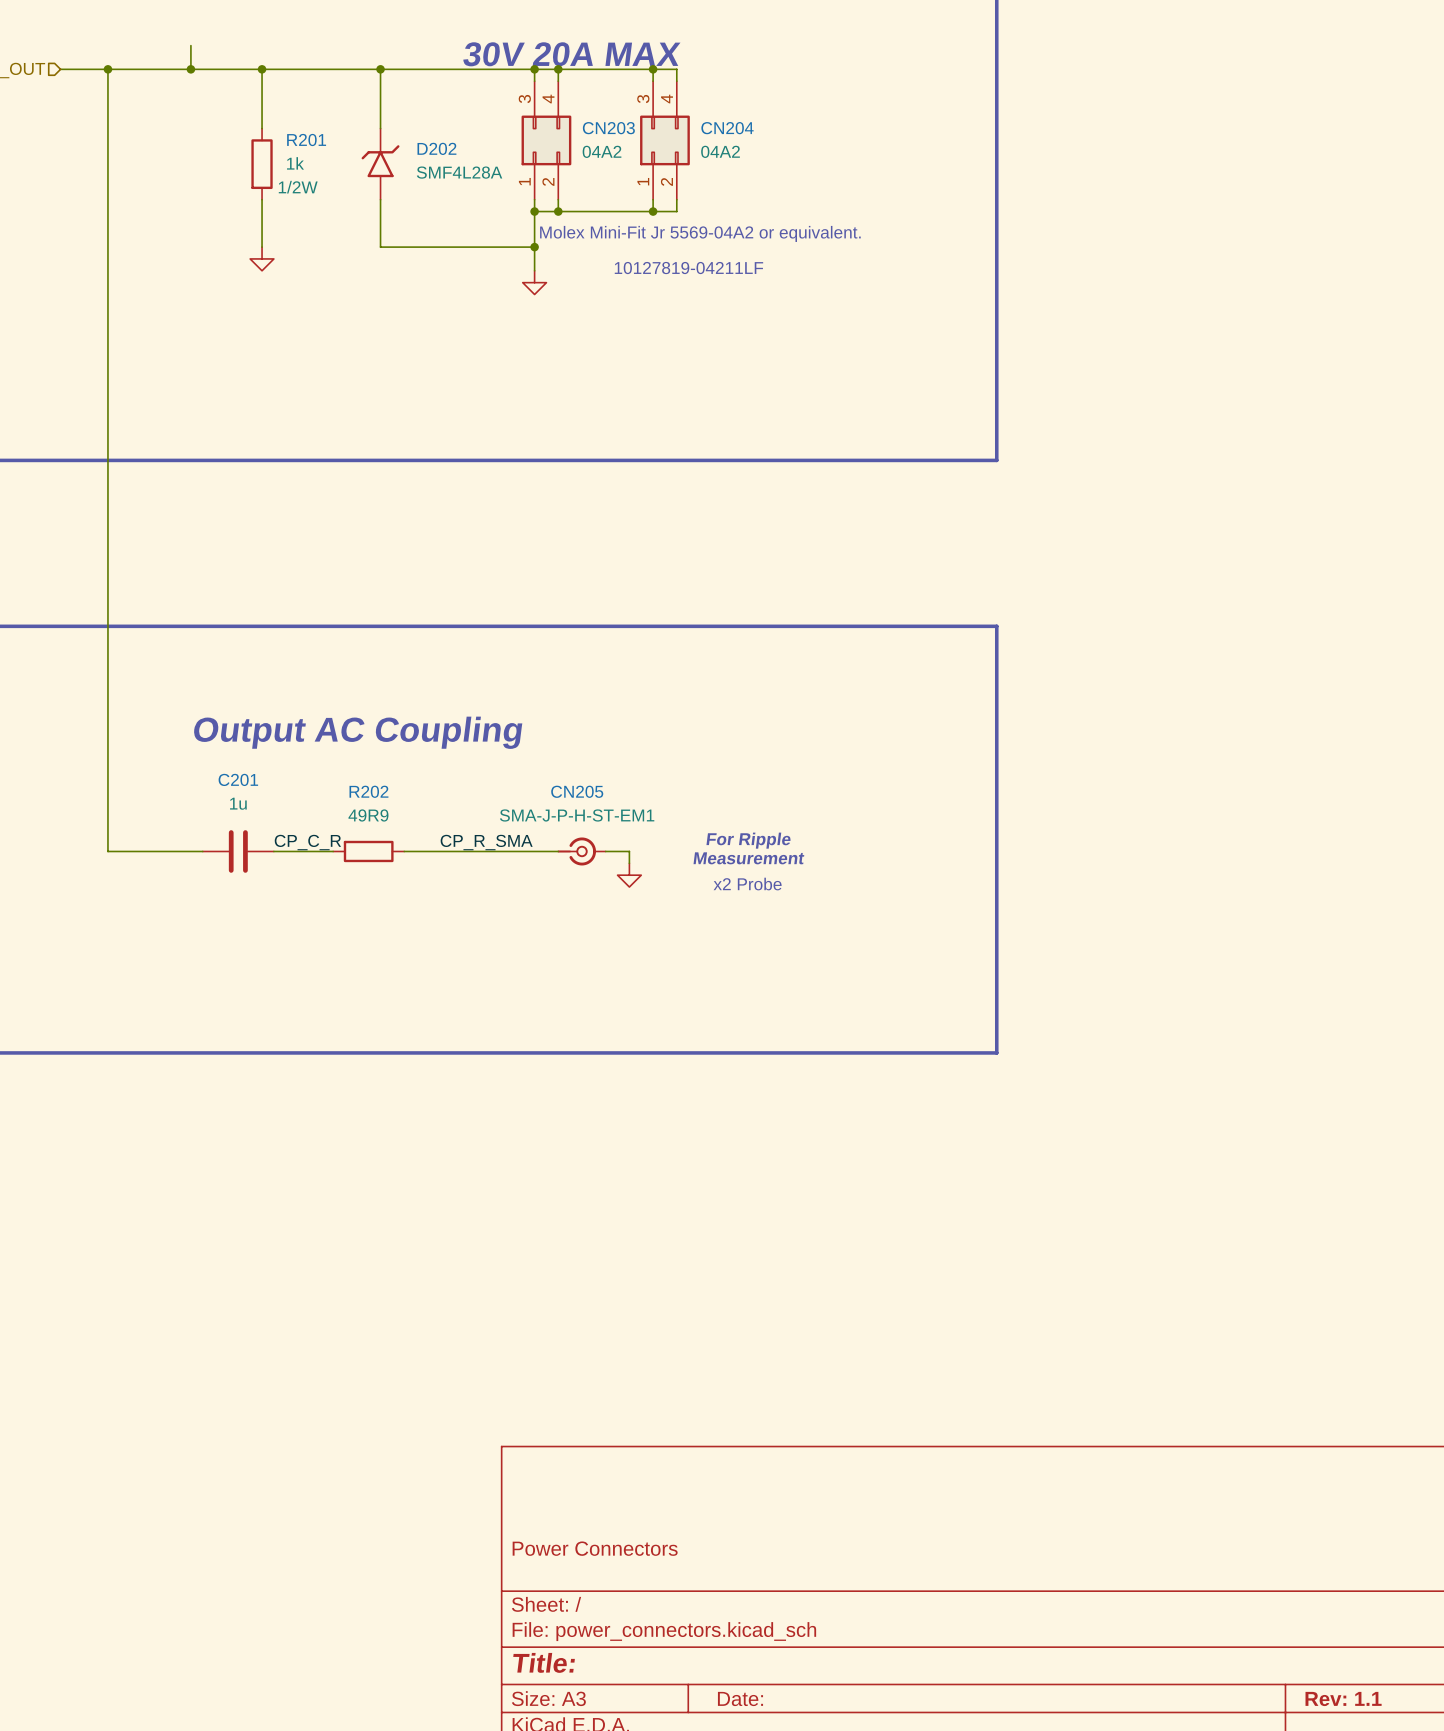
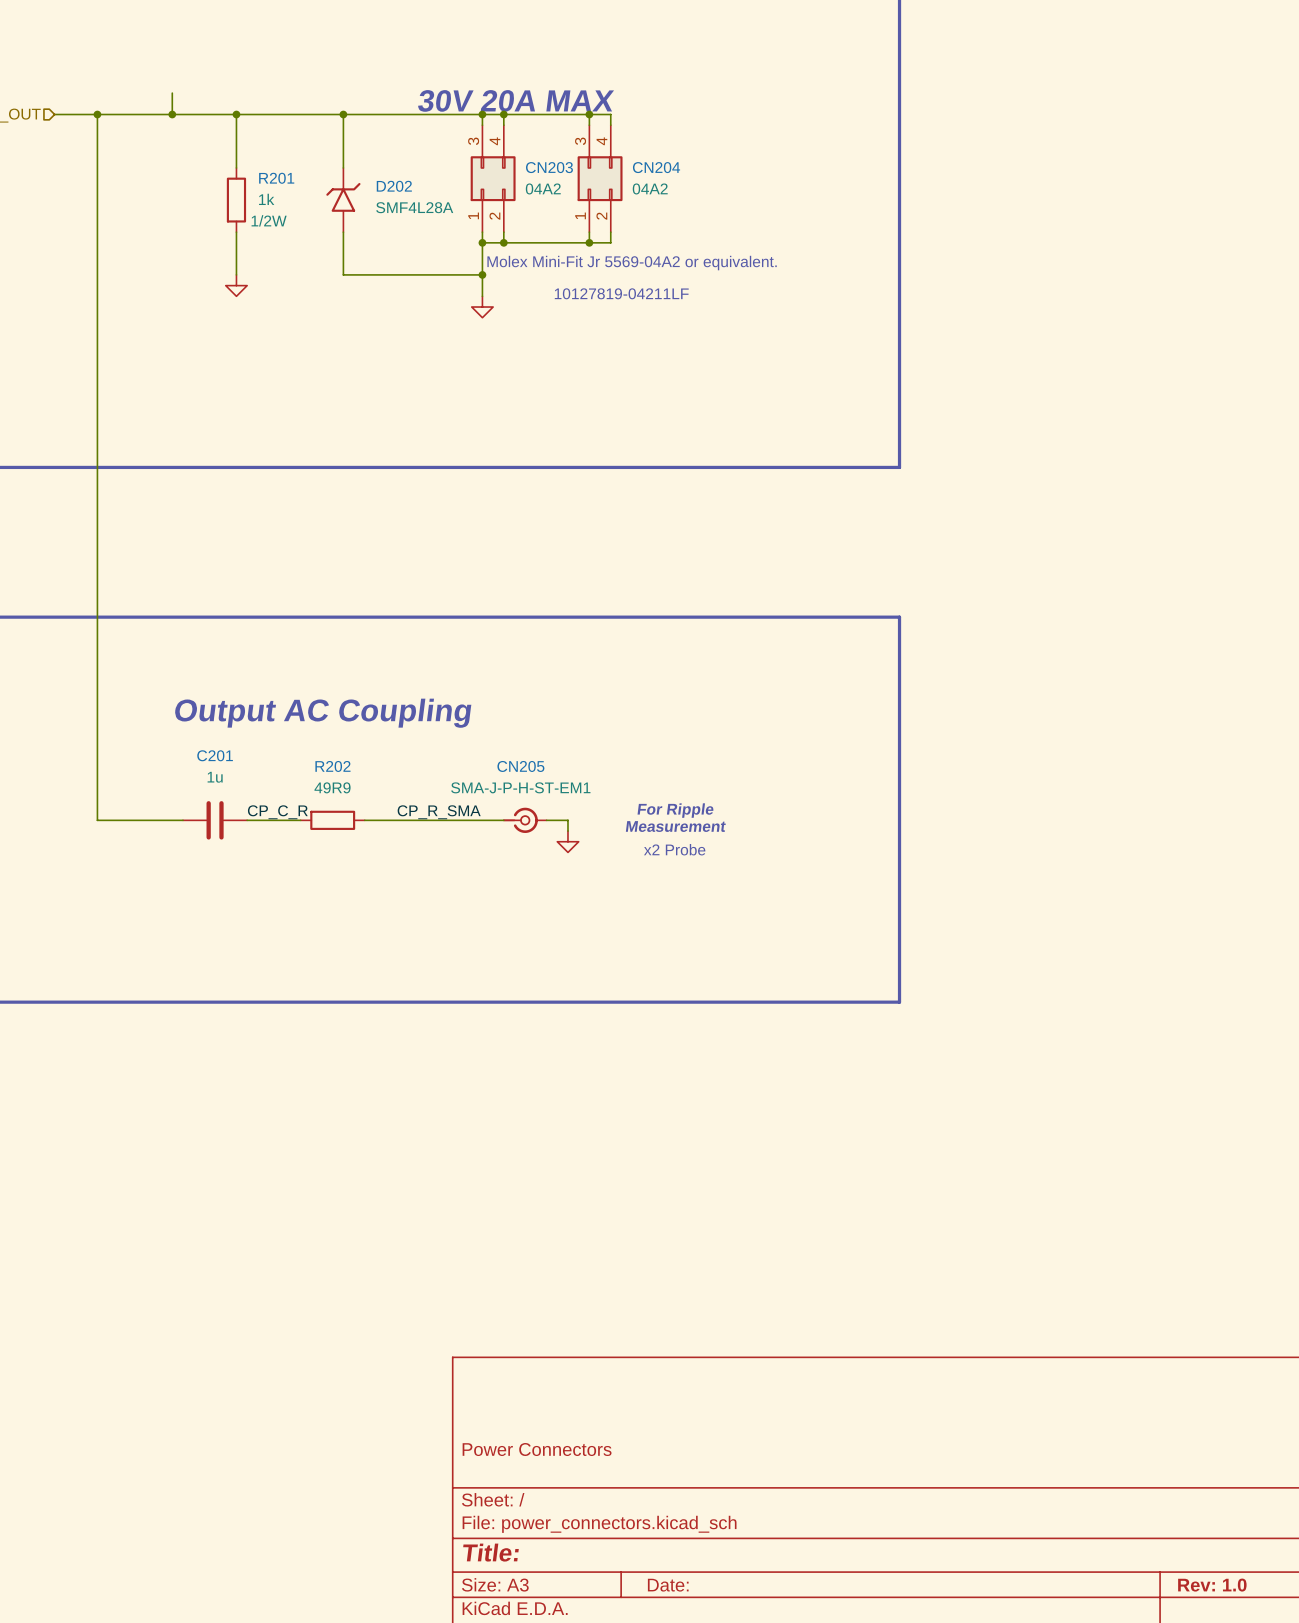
title block: Rev: 1.1 (1343, 1698) -> Rev: 1.0 (1212, 1585)

